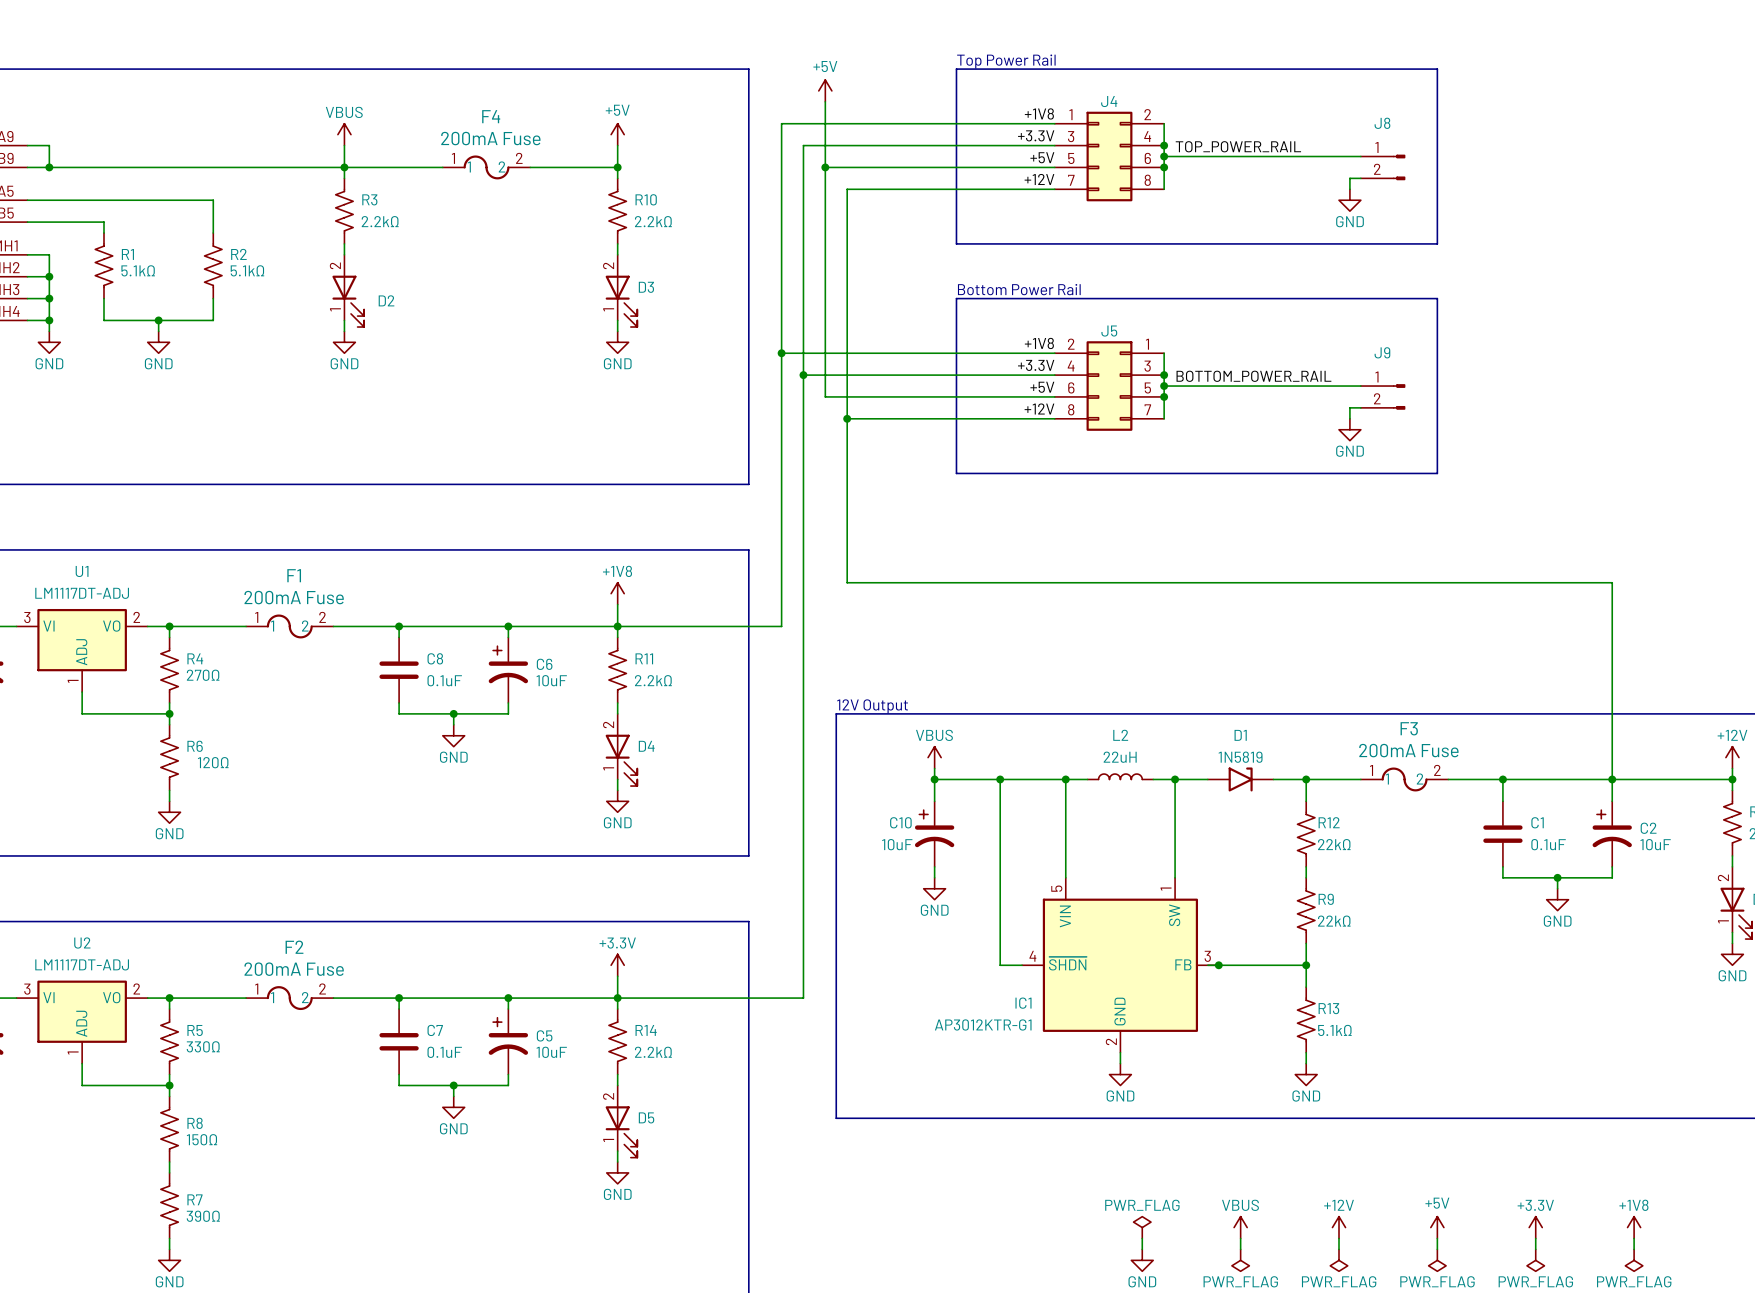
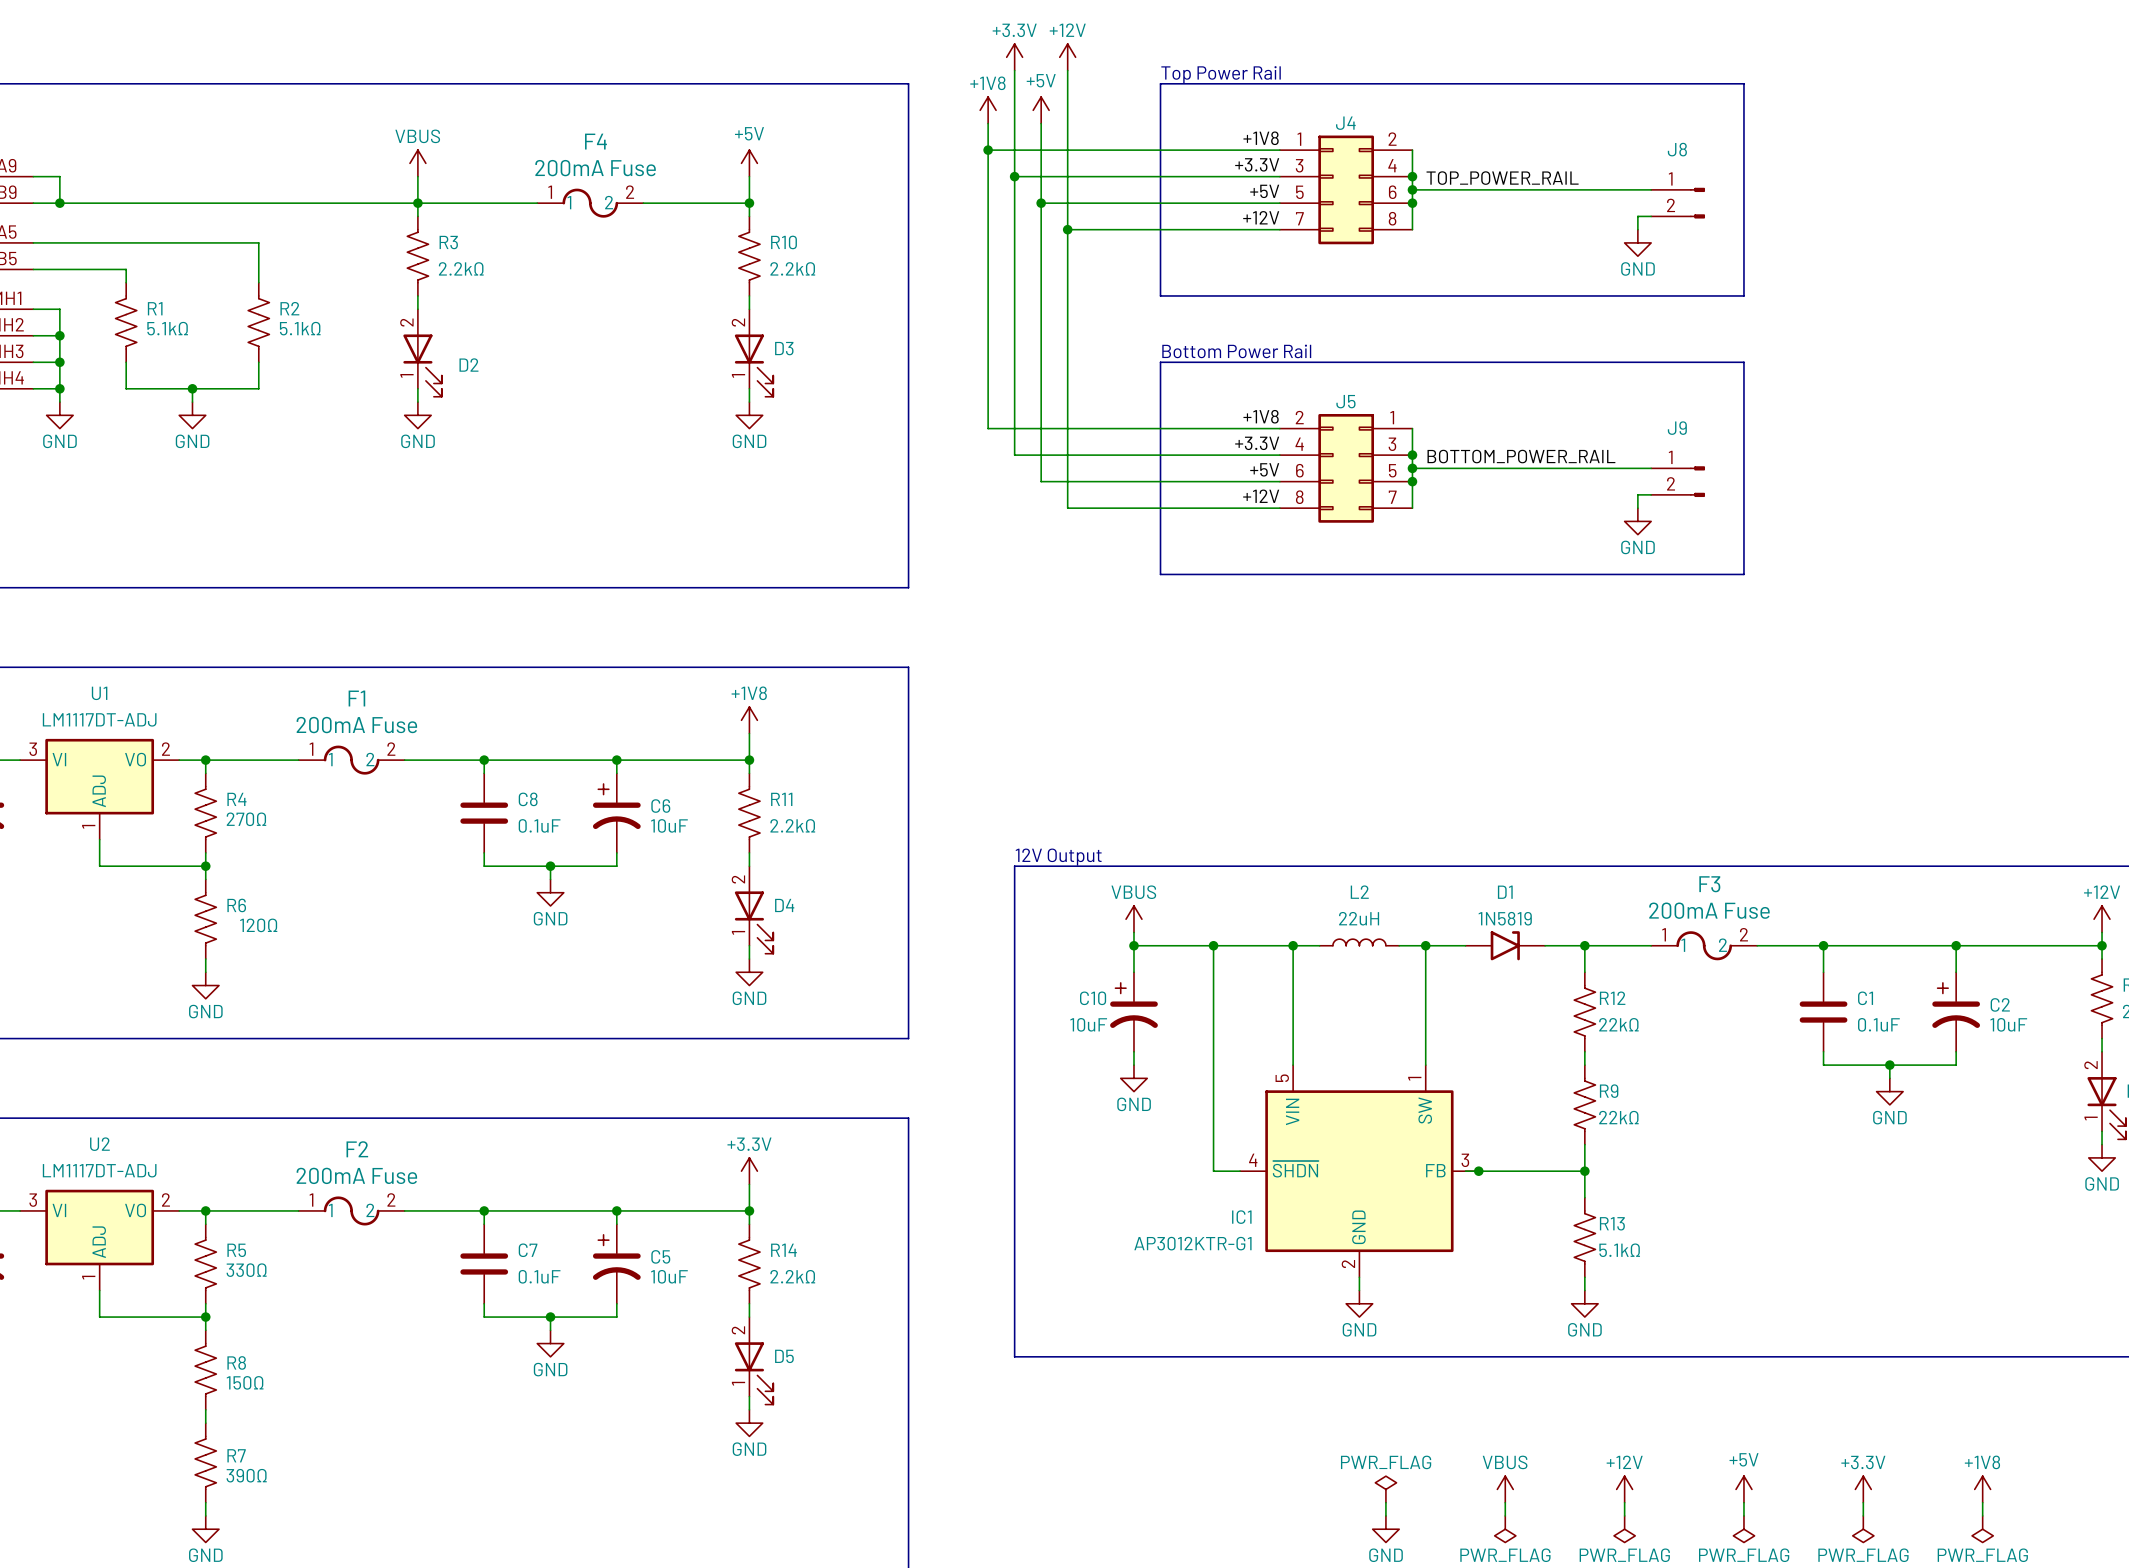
power symbol: none -> +3.3V (1014, 57)
power symbol: none -> +12V (1067, 57)
power symbol: none -> +1V8 (988, 110)
power symbol position: +5V (825, 90) -> +5V (1041, 110)
wire: (825, 101) (825, 396) (858, 396) -> (1041, 123) (1041, 481)
wire: (814, 123) (781, 123) (781, 626) (617, 626) -> none
junction: none -> (988, 150)
wire: (836, 145) (803, 145) (803, 998) (617, 998) -> none
junction: none -> (1014, 176)
wire: (825, 167) (858, 167) -> none
junction: (825, 167) -> none
junction: none -> (1041, 203)
wire: (879, 189) (847, 189) (847, 582) (1612, 582) (1612, 779) -> none
junction: none -> (1067, 229)
wire: (781, 353) (814, 353) -> (988, 123) (988, 428)
junction: (781, 353) -> none
wire: (803, 375) (836, 375) -> (1014, 70) (1014, 455)
junction: (803, 375) -> none
wire: (847, 418) (879, 418) -> (1067, 70) (1067, 508)
junction: (847, 418) -> none

